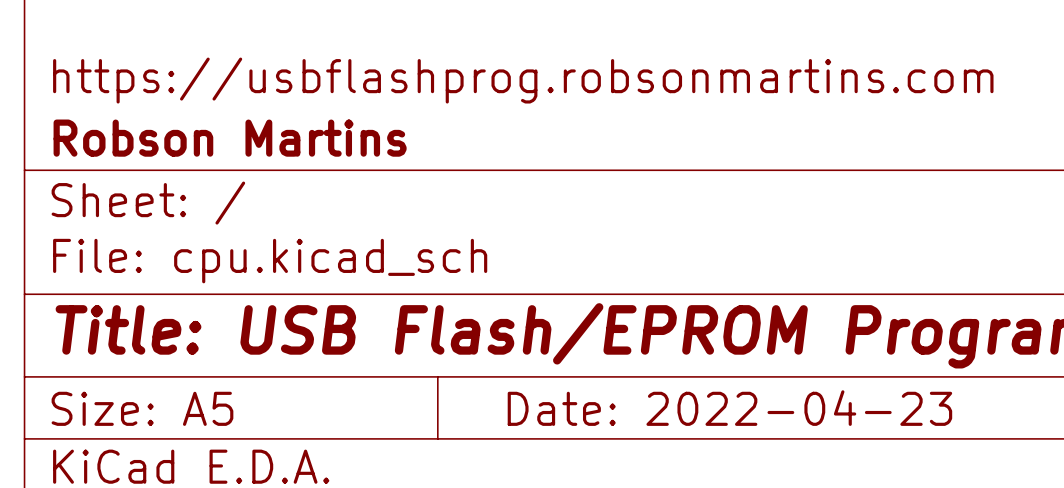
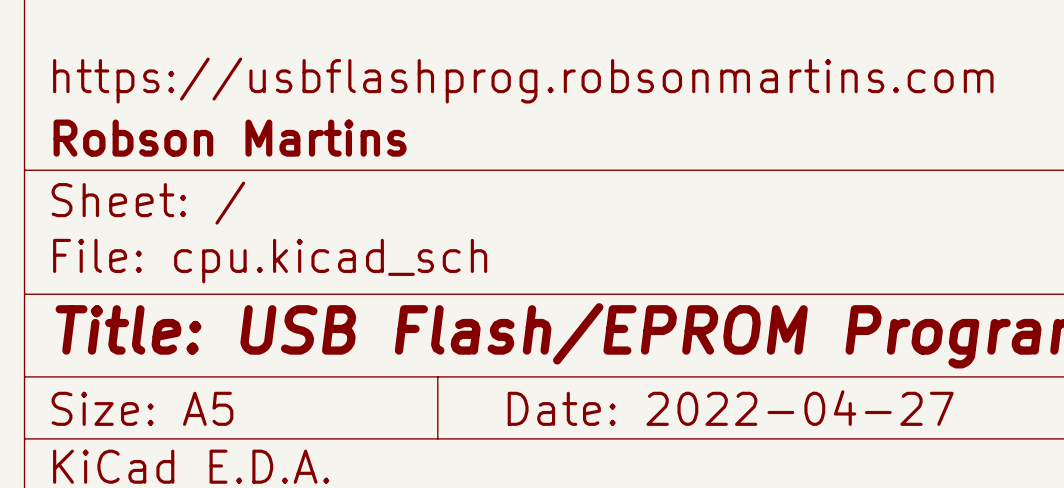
title block: Date: 2022-04-23 (729, 408) -> Date: 2022-04-27 (730, 408)

